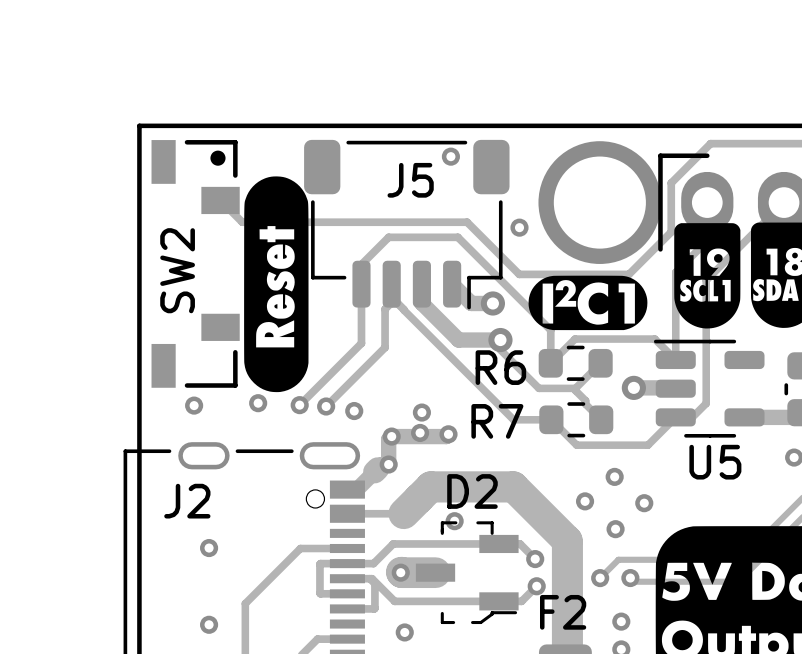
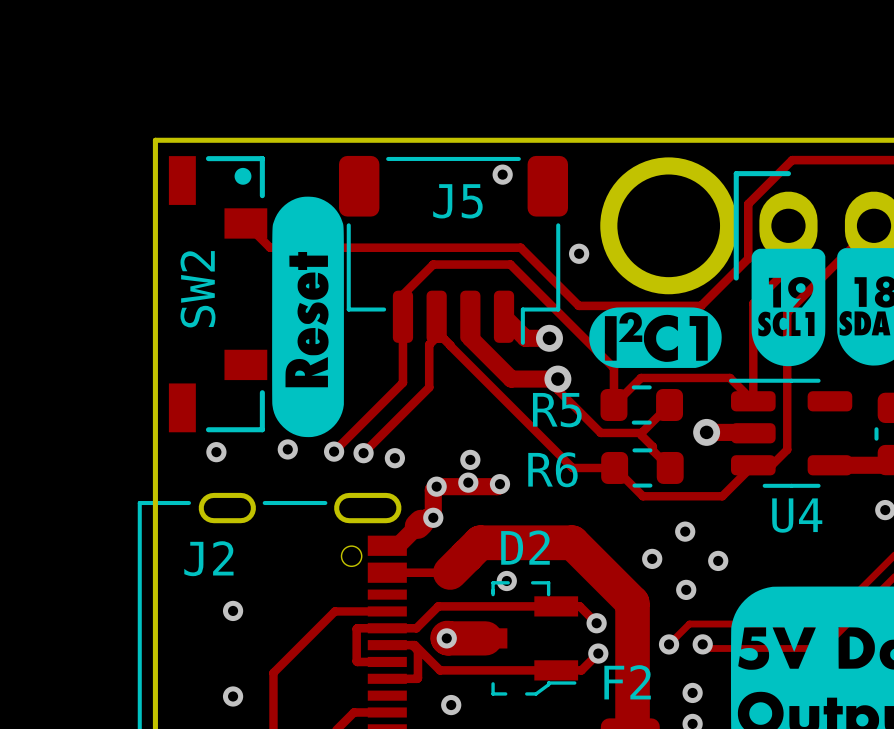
R6 name: R6 (500, 367) -> R5 (557, 410)
R7 name: R7 (497, 421) -> R6 (552, 469)
U5 name: U5 (715, 462) -> U4 (797, 515)

